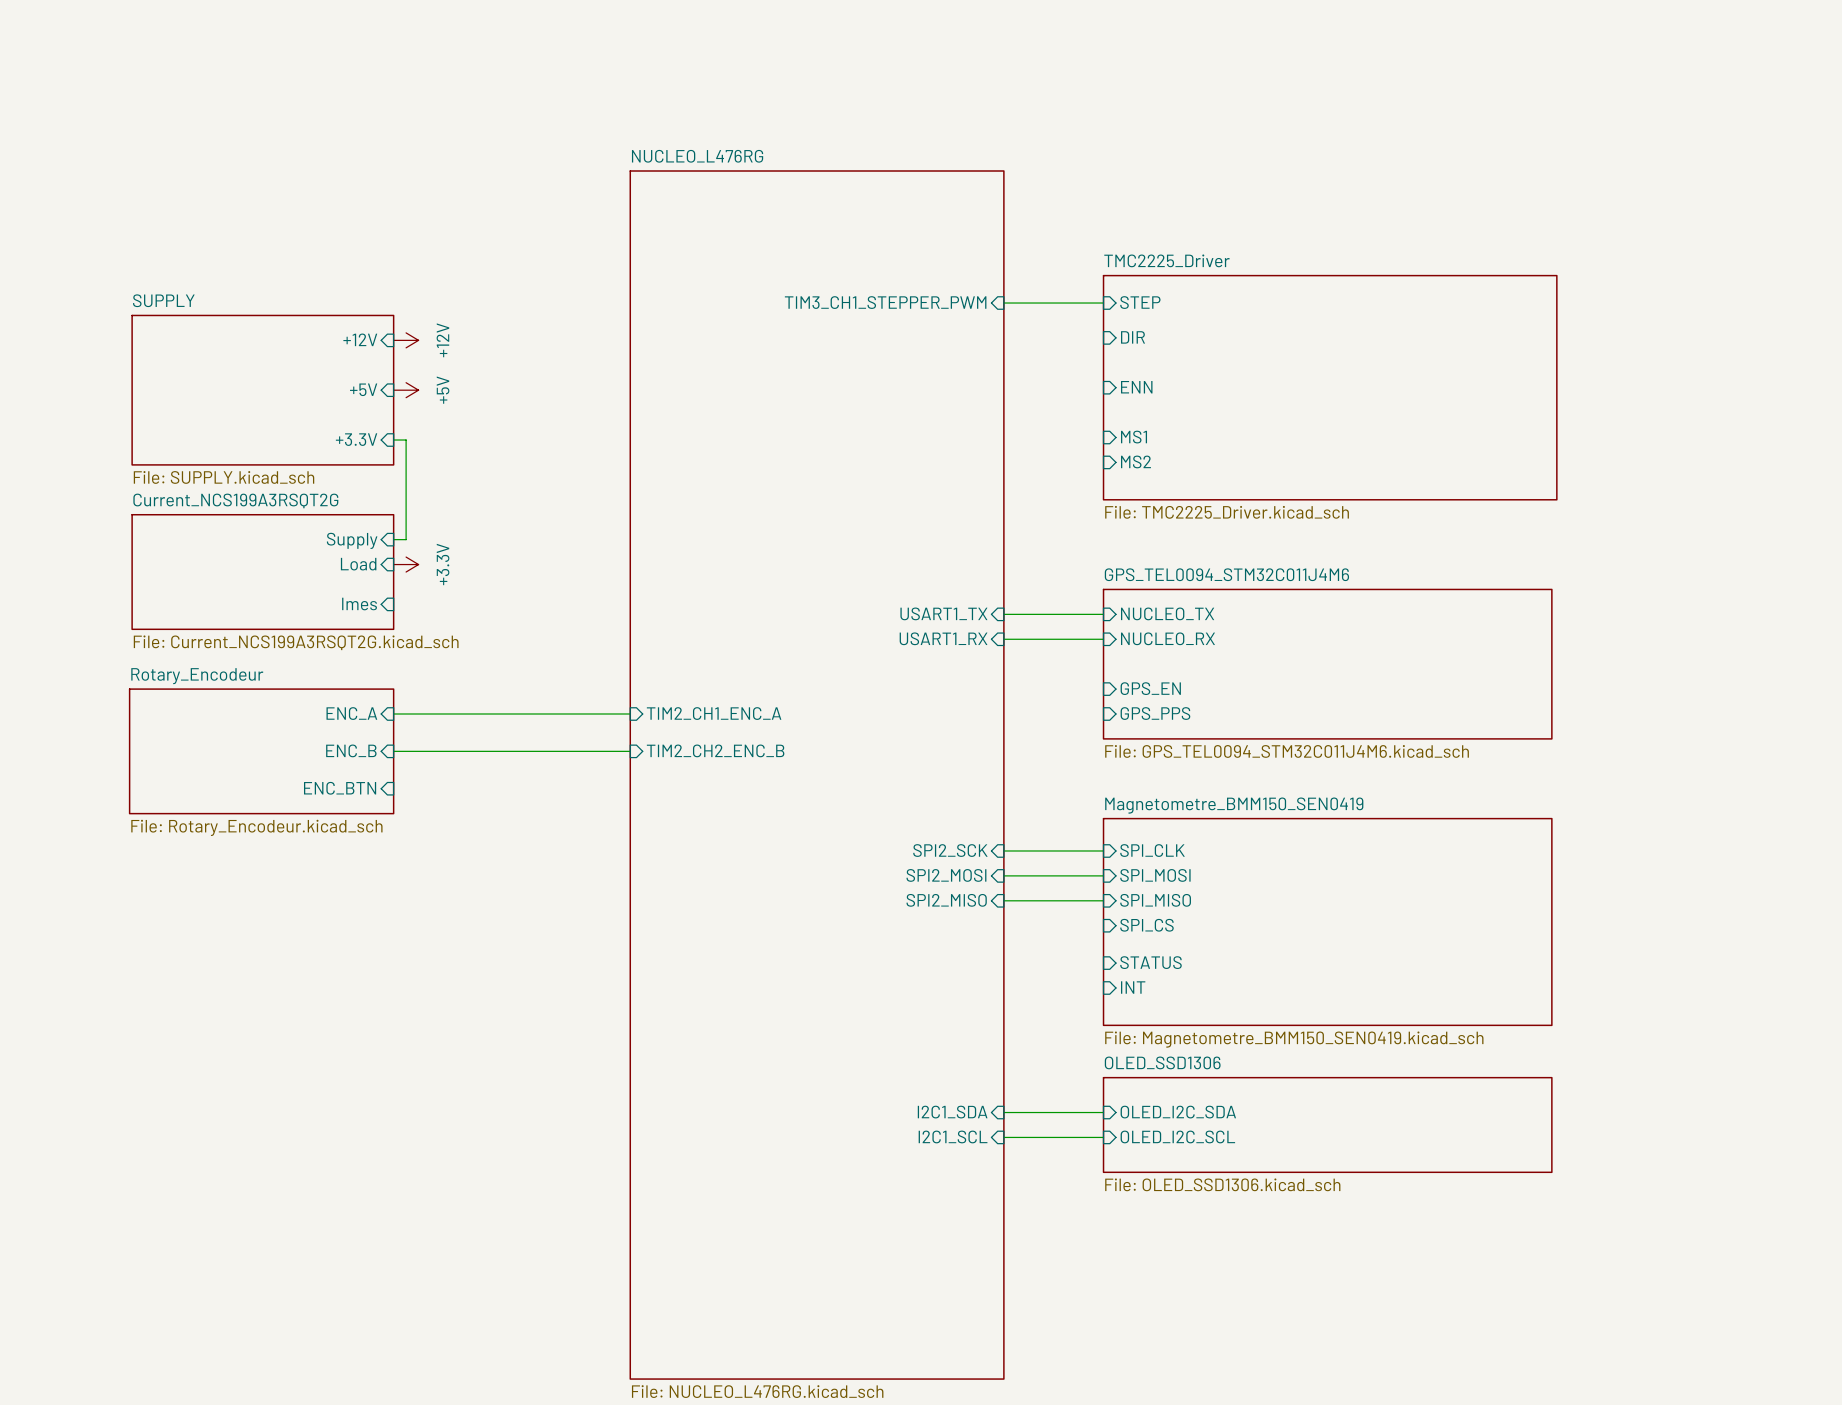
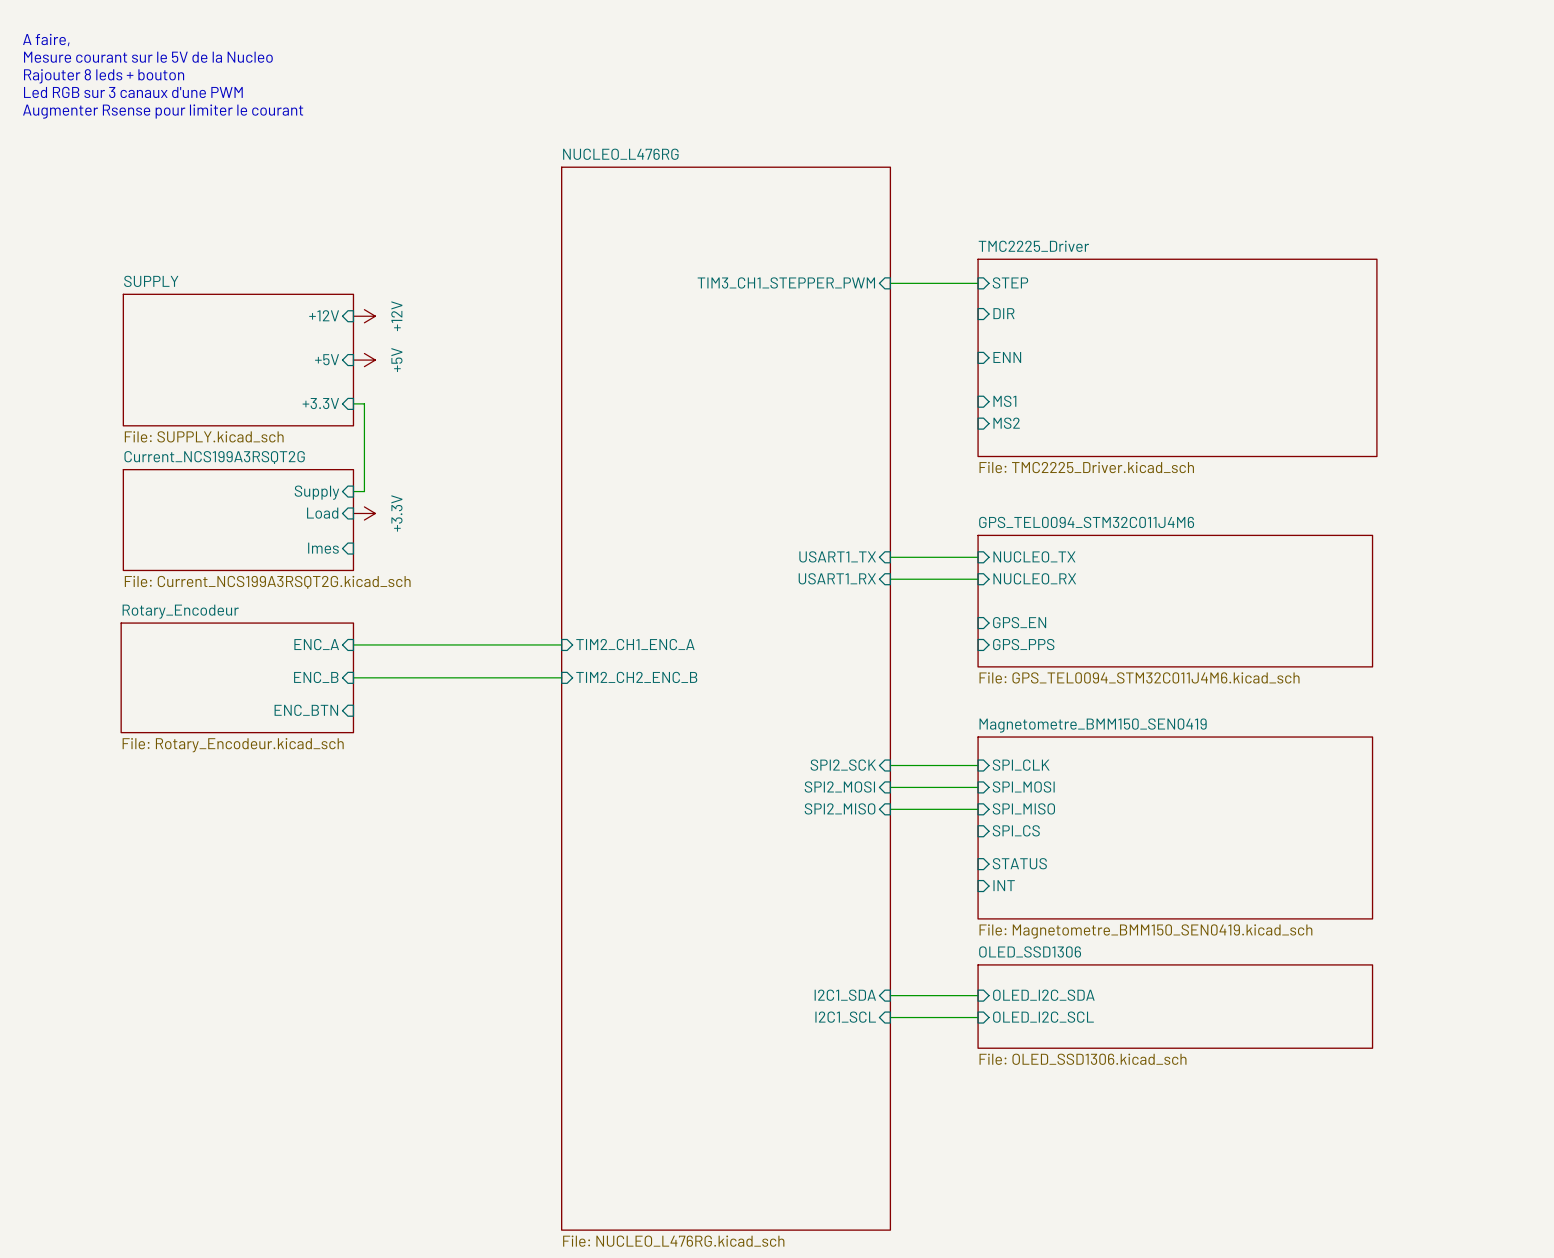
text: none -> A faire, (46, 40)
text: none -> Mesure courant sur le 5V de la Nucleo (148, 57)
text: none -> Rajouter 8 leds + bouton (104, 76)
text: none -> Led RGB sur 3 canaux d'une PWM (133, 92)
text: none -> Augmenter Rsense pour limiter le courant (163, 111)

